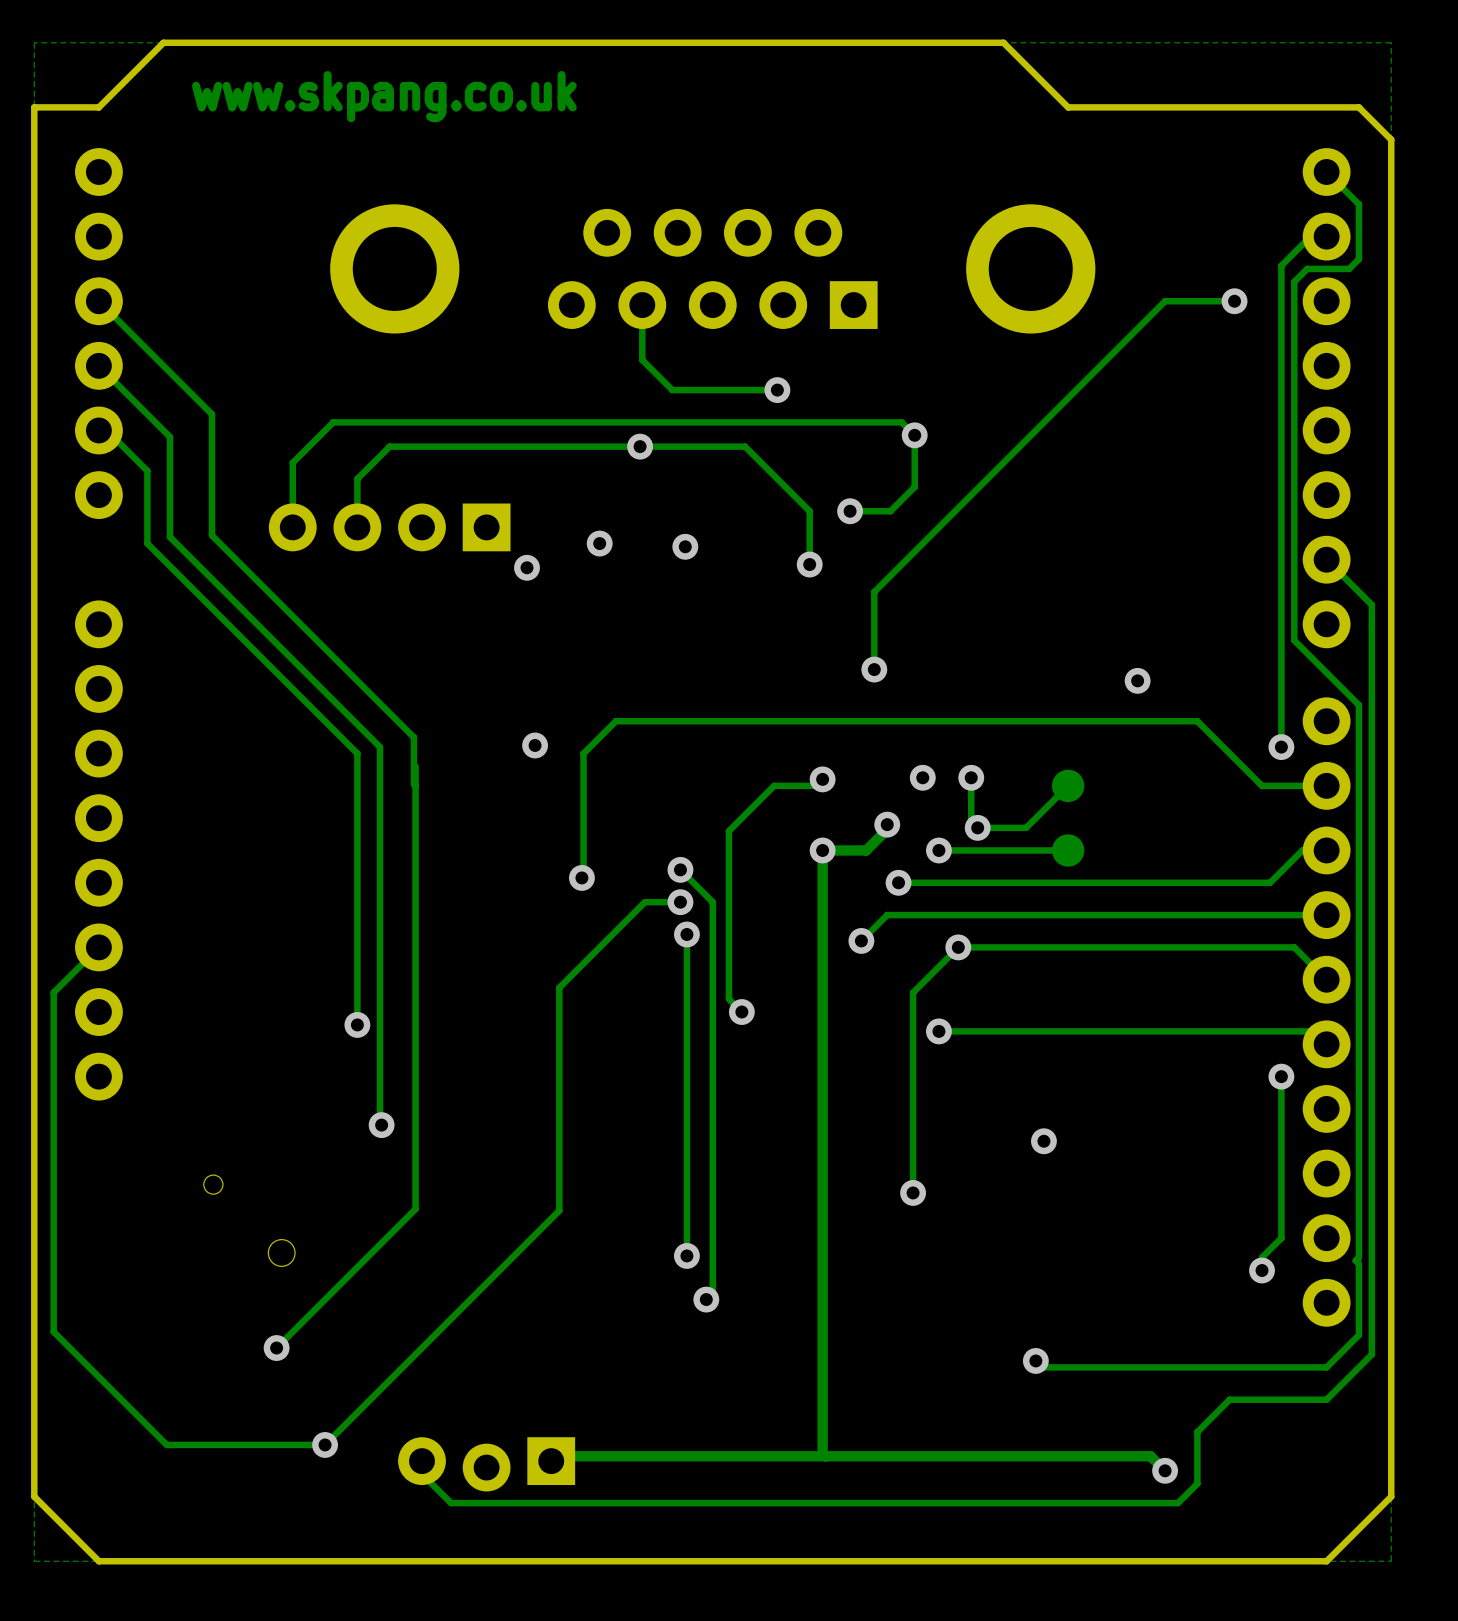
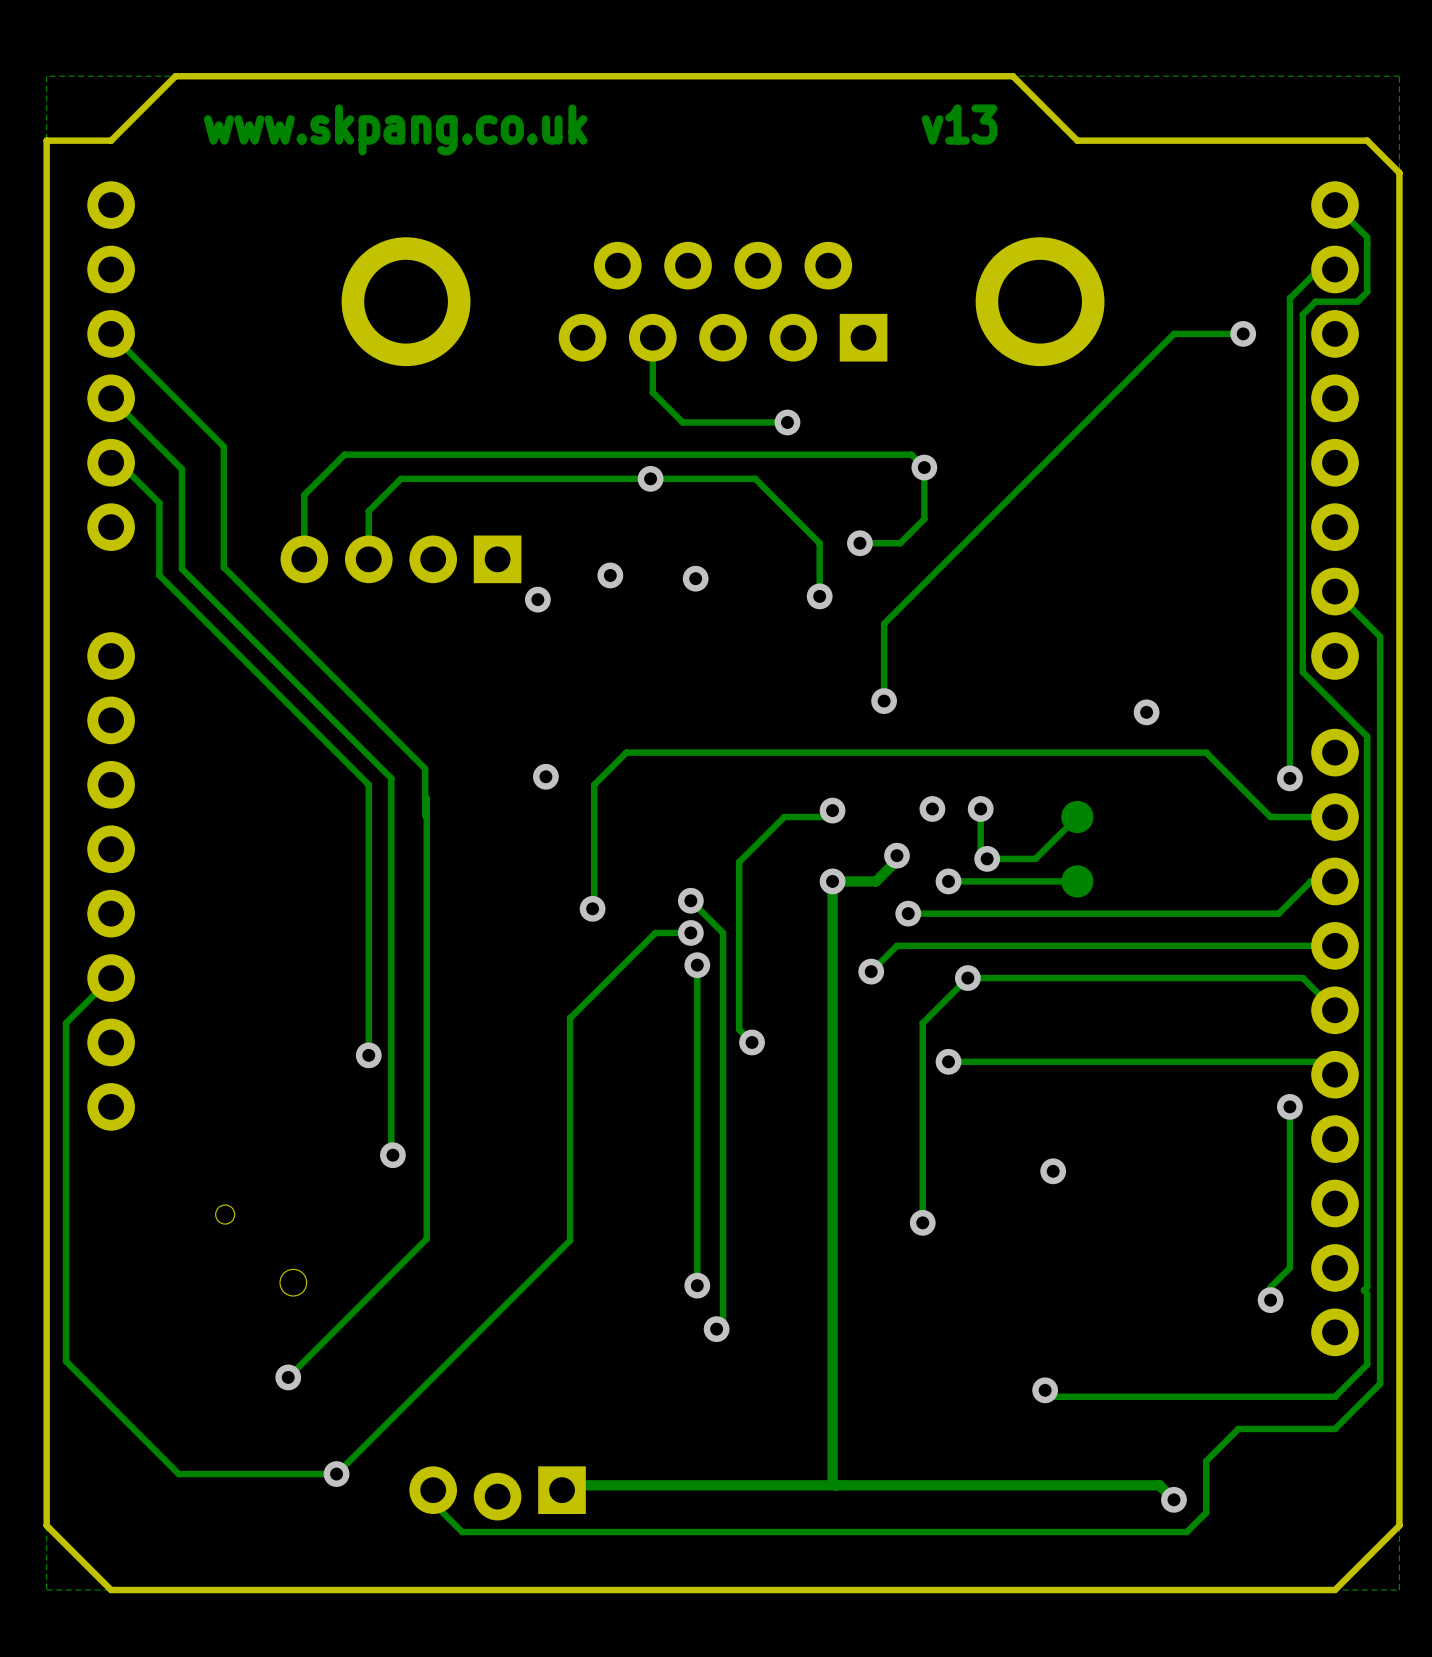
text: none -> v13 (959, 124)

